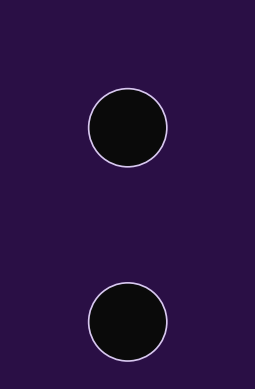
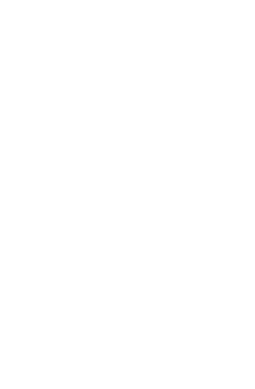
part: (127, 127) -> none
part: (127, 321) -> none

